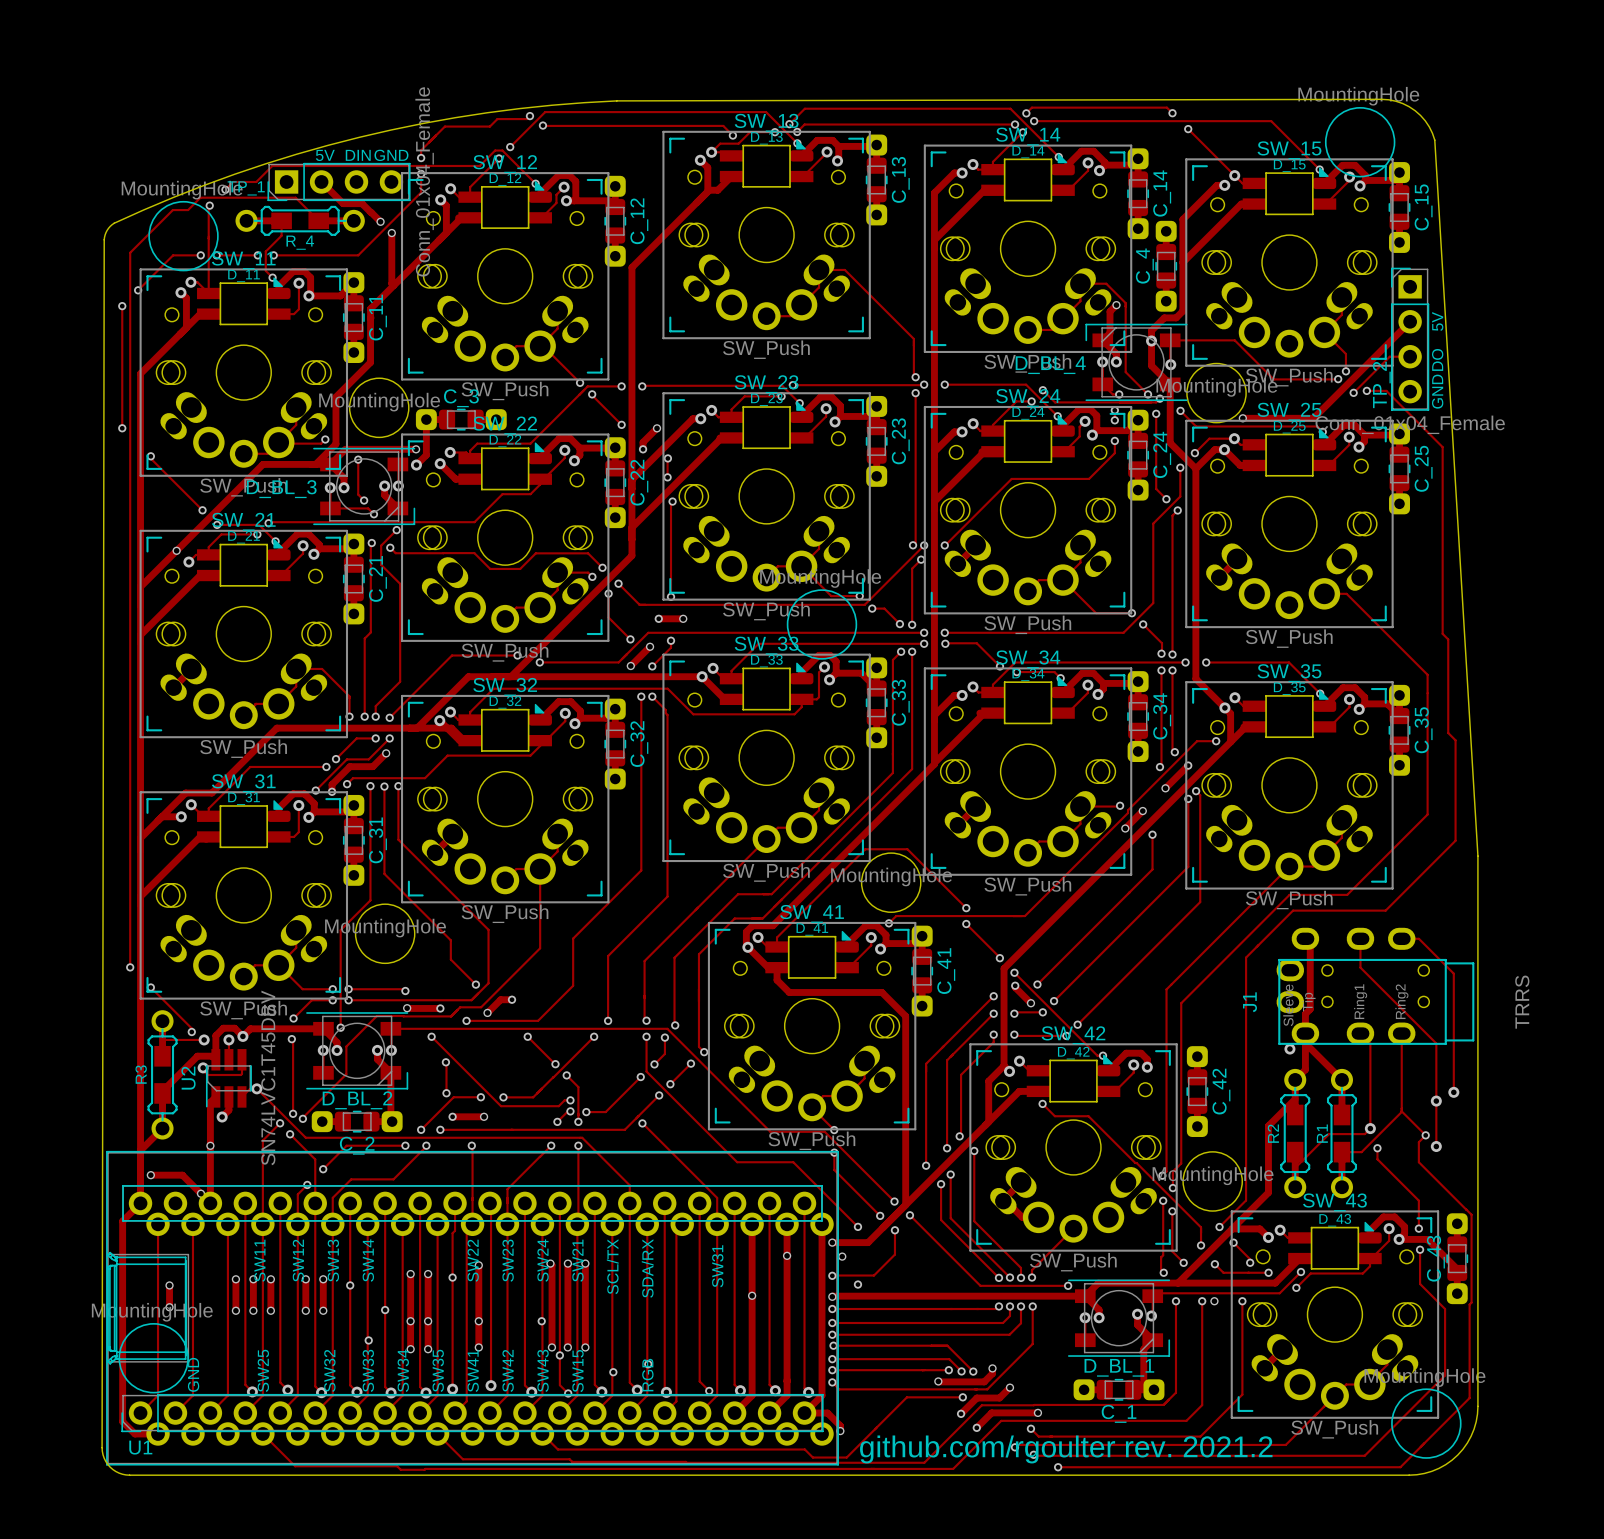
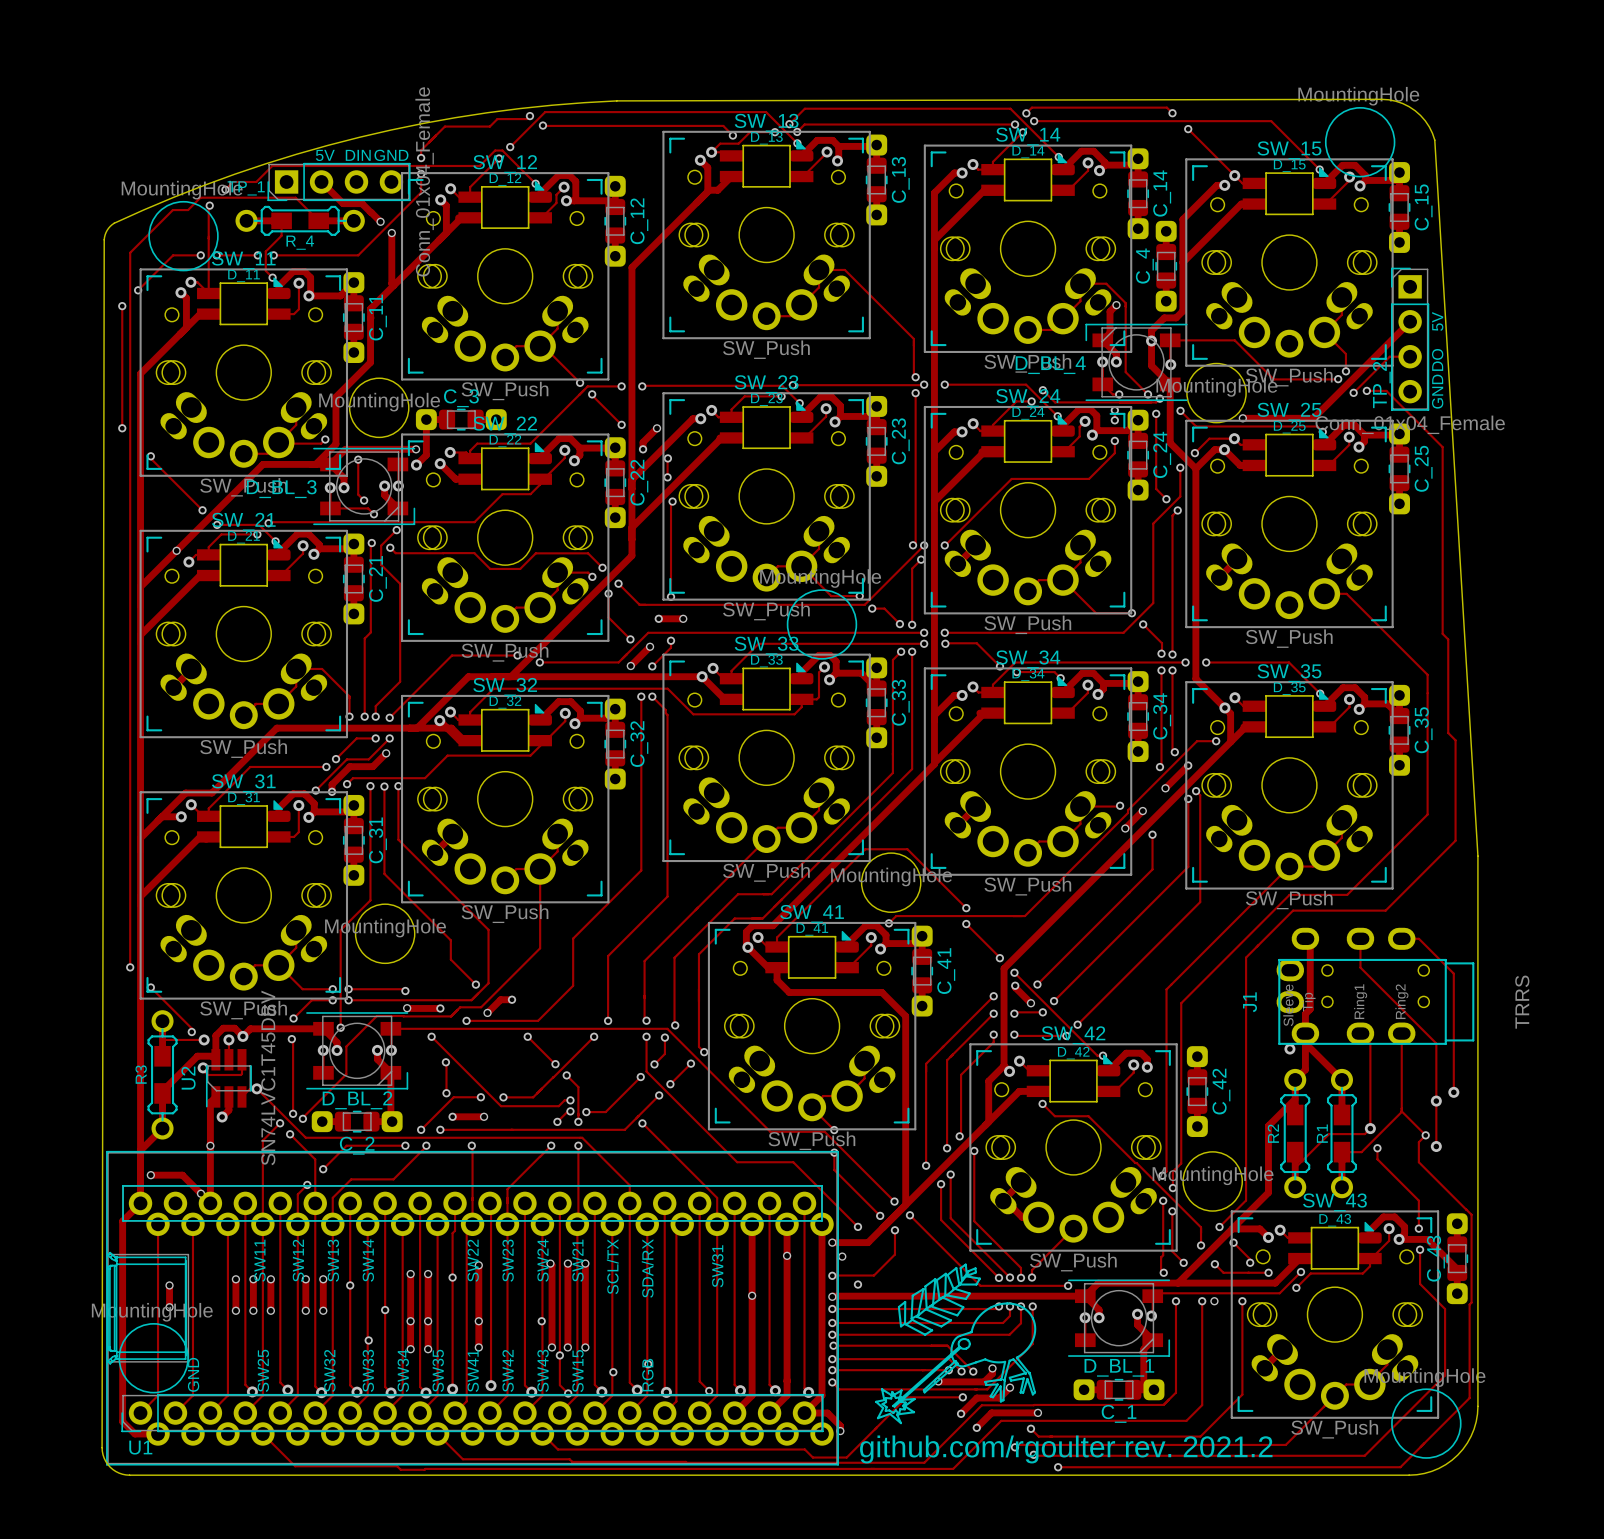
line: none -> (965, 1264) (966, 1273) (961, 1279) (960, 1268) (965, 1264)
line: none -> (956, 1268) (959, 1285) (953, 1289) (947, 1274) (956, 1268)
line: none -> (975, 1268) (975, 1272) (966, 1275) (968, 1271) (975, 1268)
line: none -> (945, 1273) (945, 1295) (939, 1299) (936, 1280) (945, 1273)
line: none -> (965, 1276) (979, 1278) (976, 1284) (959, 1284) (965, 1276)
line: none -> (935, 1279) (933, 1304) (926, 1308) (925, 1286) (935, 1279)
line: none -> (954, 1288) (969, 1293) (965, 1298) (946, 1295) (954, 1288)
line: none -> (923, 1289) (918, 1314) (911, 1318) (912, 1295) (923, 1289)
line: none -> (942, 1297) (963, 1307) (957, 1315) (930, 1306) (942, 1297)
line: none -> (905, 1301) (905, 1323) (900, 1326) (898, 1306) (905, 1301)
line: none -> (925, 1309) (951, 1320) (941, 1326) (916, 1316) (925, 1309)
line: none -> (912, 1319) (932, 1330) (925, 1334) (906, 1324) (912, 1319)
line: none -> (964, 1339) (958, 1343) (960, 1347) (964, 1348) (969, 1343) (968, 1340) (964, 1339)
line: none -> (958, 1347) (892, 1406) (960, 1347) (958, 1347)
line: none -> (955, 1360) (957, 1363) (924, 1392) (923, 1390) (955, 1360)
line: none -> (1029, 1373) (1016, 1357) (1026, 1349) (1032, 1339) (1035, 1329) (1032, 1318) (1027, 1310) (1019, 1305) (1009, 1303) (999, 1304) (981, 1314) (974, 1322) (971, 1332) (956, 1338) (951, 1351) (954, 1361) (960, 1366) (985, 1359) (994, 1362) (1005, 1361) (1001, 1379)
line: none -> (1029, 1373) (1034, 1392) (1032, 1394) (1027, 1378) (1023, 1392) (1020, 1392) (1023, 1378) (1011, 1380) (1009, 1377) (1025, 1373) (1013, 1359) (1009, 1360) (1004, 1380)
line: none -> (1000, 1379) (985, 1381) (986, 1384) (997, 1384) (990, 1396) (993, 1397) (1000, 1386) (1000, 1401) (1003, 1400) (1004, 1380)
line: none -> (882, 1389) (892, 1395) (901, 1390) (899, 1400) (914, 1399) (904, 1406) (914, 1412) (897, 1414) (901, 1423) (889, 1413) (877, 1418) (883, 1408) (876, 1401) (884, 1400) (882, 1389)
line: none -> (892, 1391) (895, 1398) (901, 1396) (900, 1401) (905, 1402) (903, 1405) (904, 1409) (900, 1409) (899, 1414) (895, 1410) (893, 1412) (885, 1410) (886, 1407) (882, 1404) (886, 1402) (885, 1398) (891, 1398) (892, 1391)

